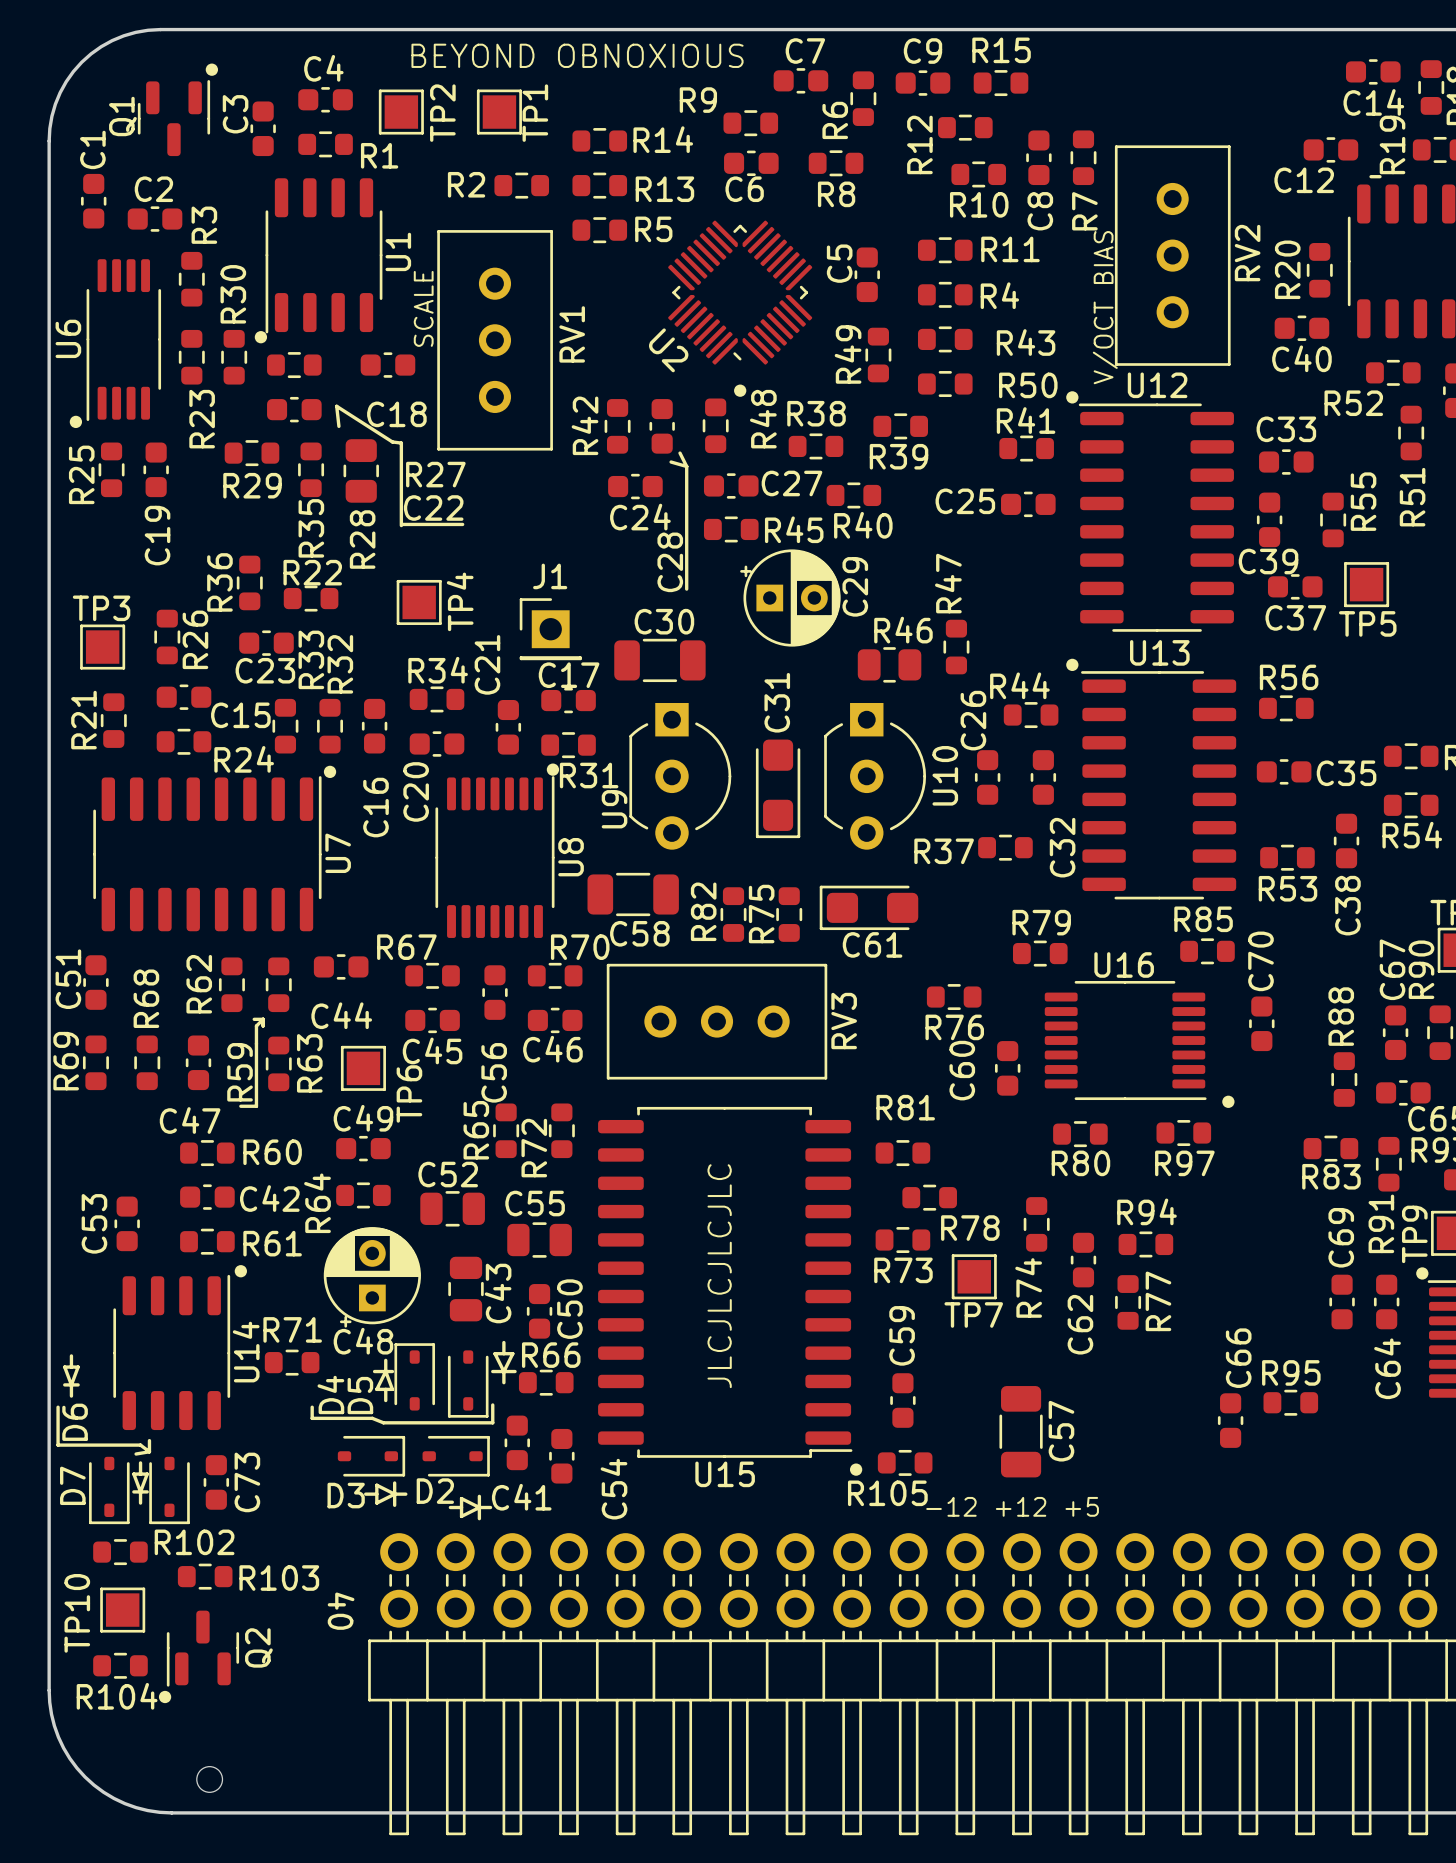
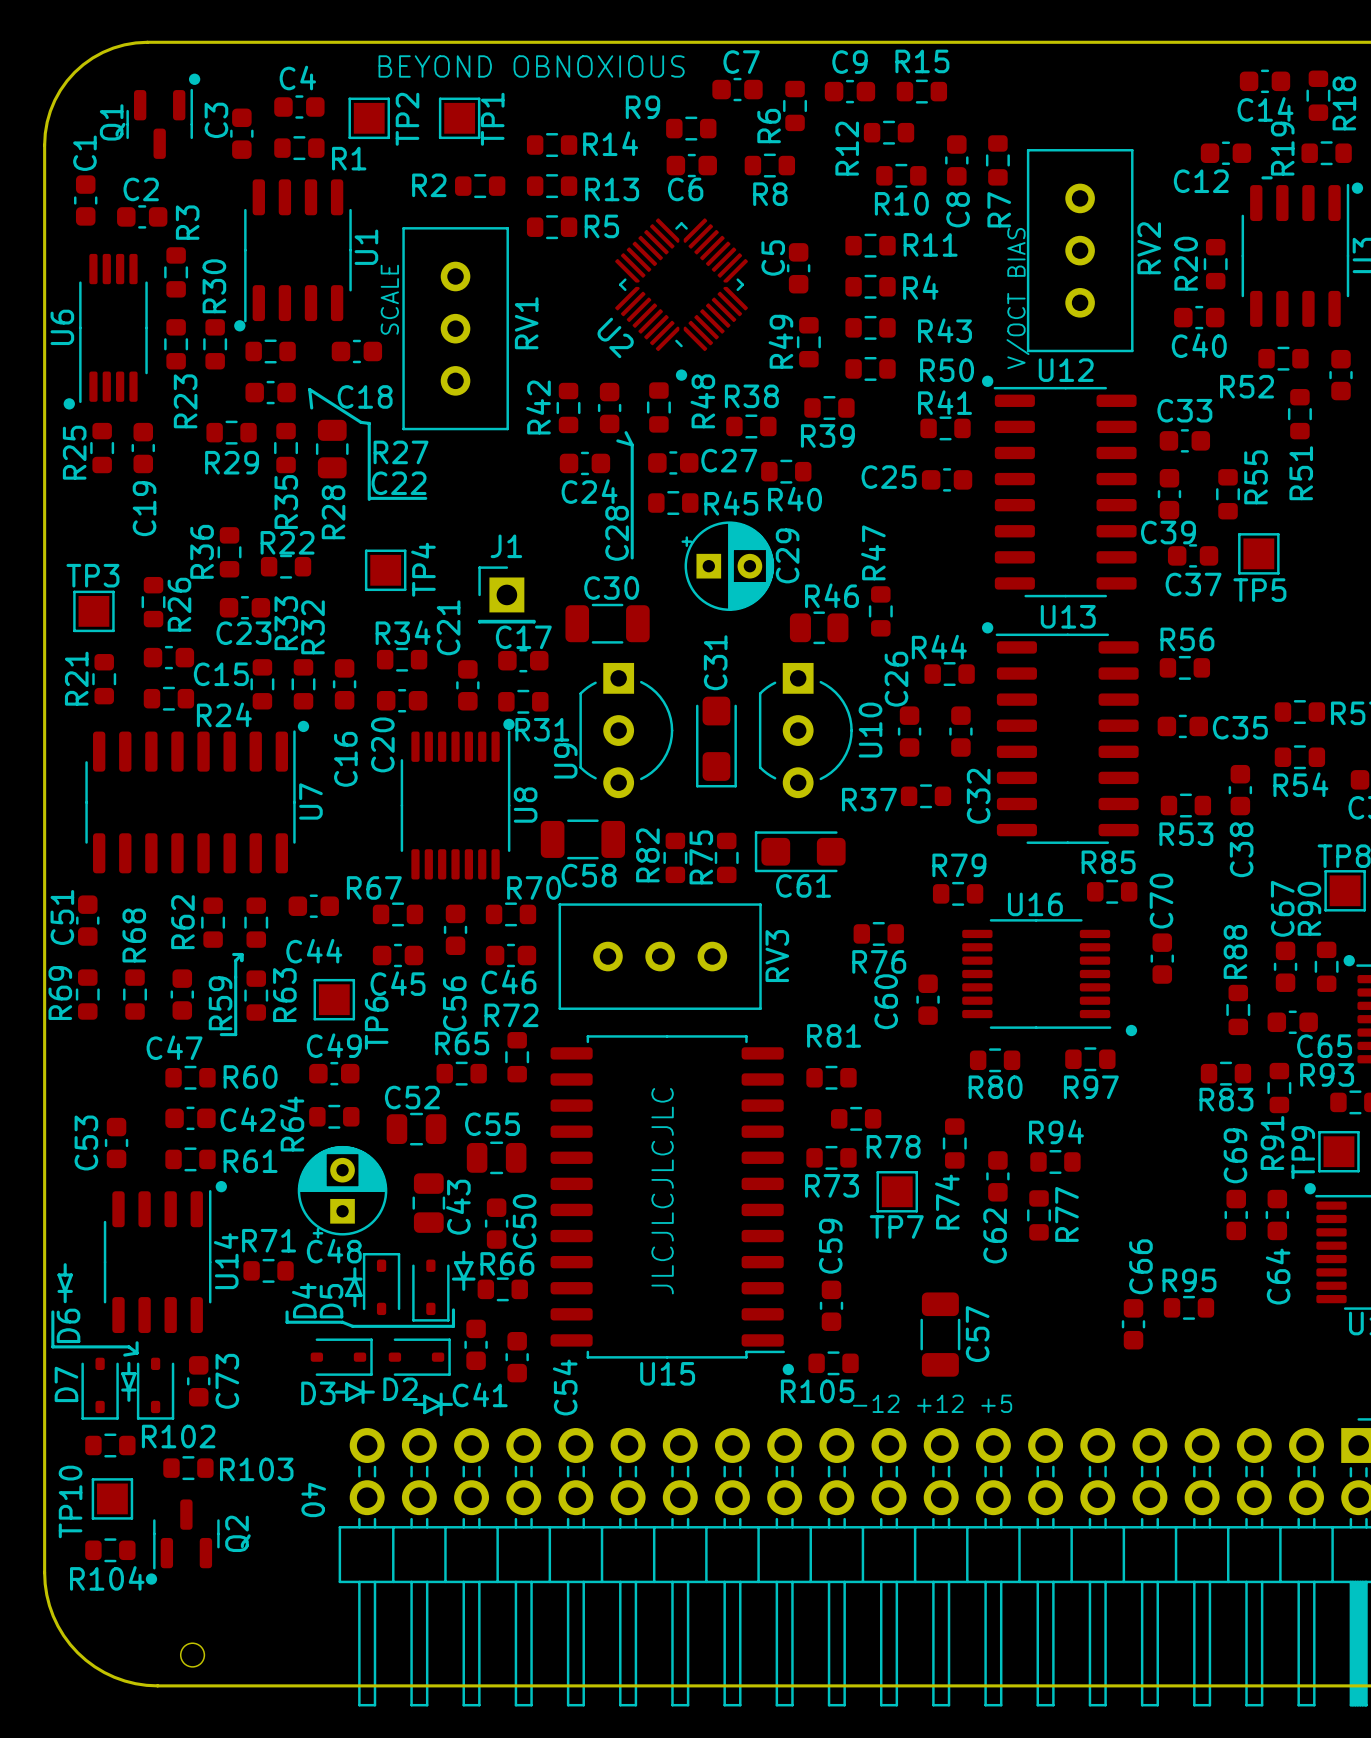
R65 rotation: 0° (506, 1130) -> 90° clockwise (461, 1073)
R72 name rotation: 0° (534, 1148) -> 90° clockwise (511, 1015)

